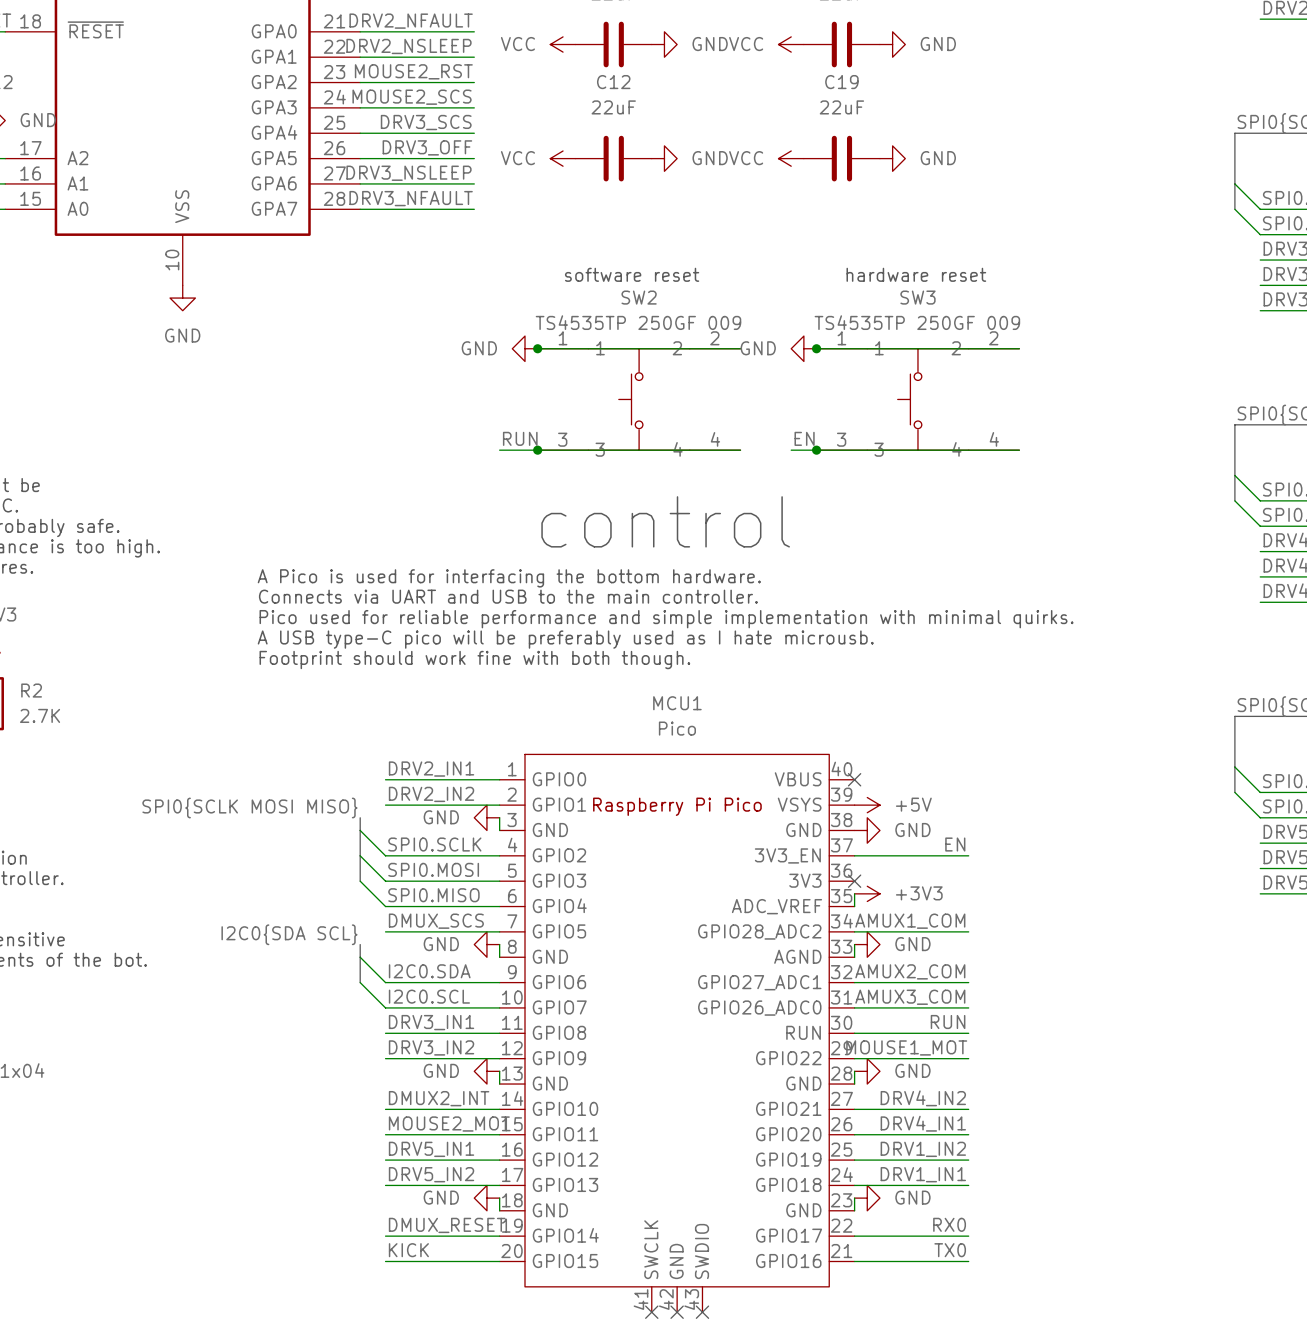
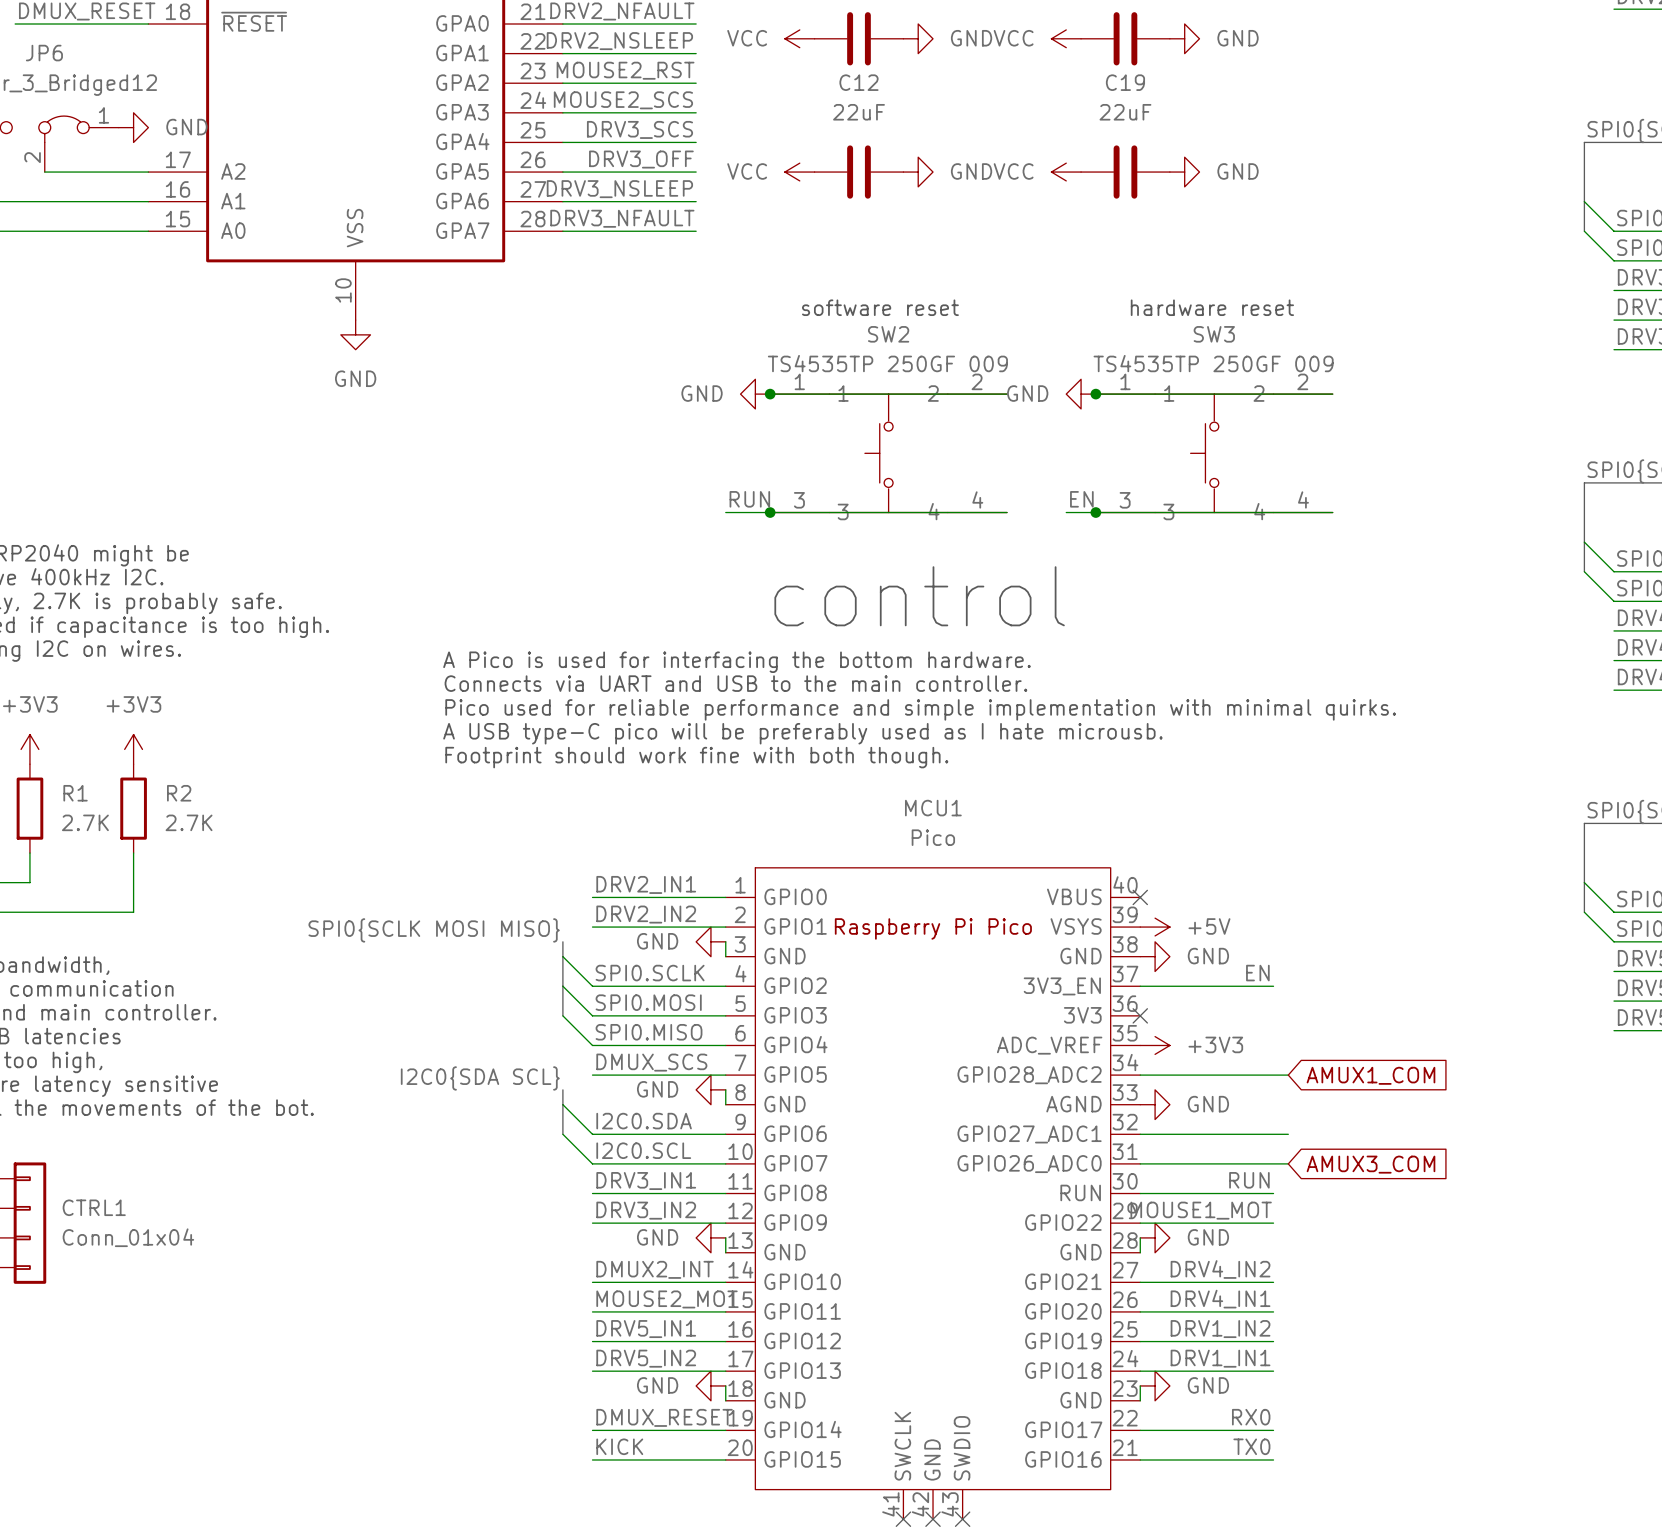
wire: (854, 893) (854, 906) -> none
power symbol position: +3V3 (867, 893) -> +3V3 (1155, 1045)
label: AMUX1_COM (910, 921) -> none
wire: none -> (1273, 1075) (1288, 1075)
global label: none -> AMUX1_COM (1370, 1075)
wire: (854, 944) (854, 957) -> none
power symbol position: GND (867, 944) -> GND (1155, 1104)
label: AMUX2_COM (910, 971) -> none
wire: none -> (1273, 1134) (1288, 1134)
label: AMUX3_COM (910, 997) -> none
wire: none -> (1273, 1163) (1288, 1163)
global label: none -> AMUX3_COM (1370, 1164)

